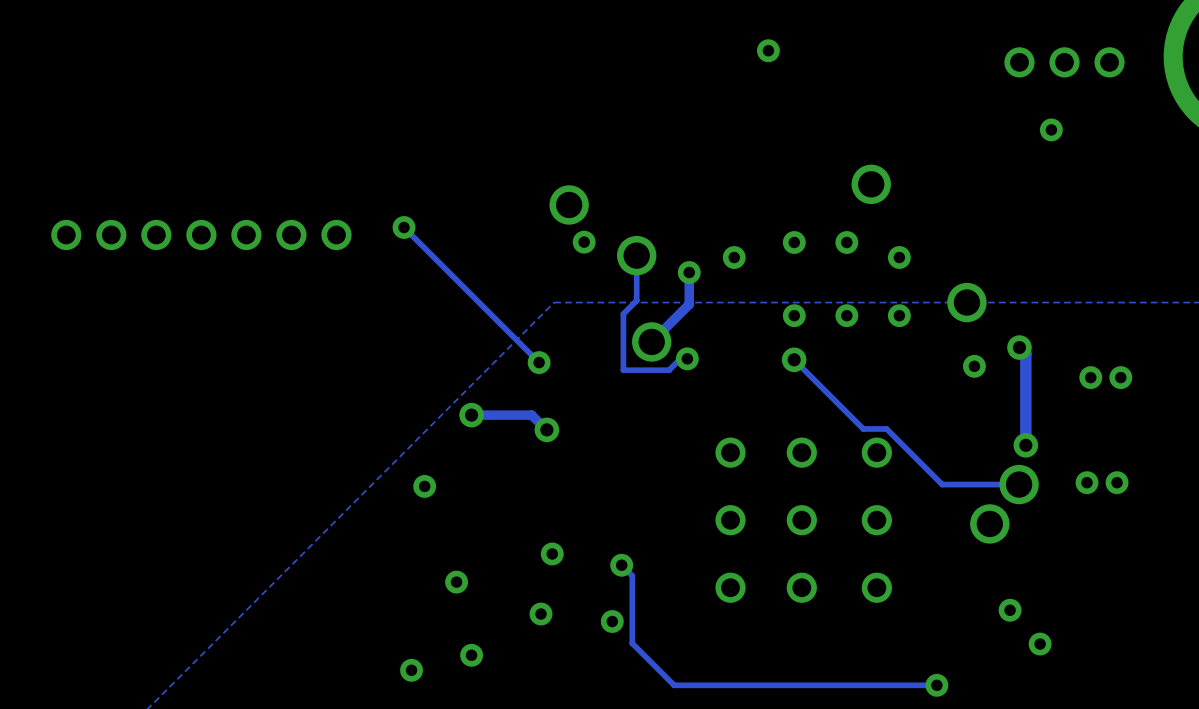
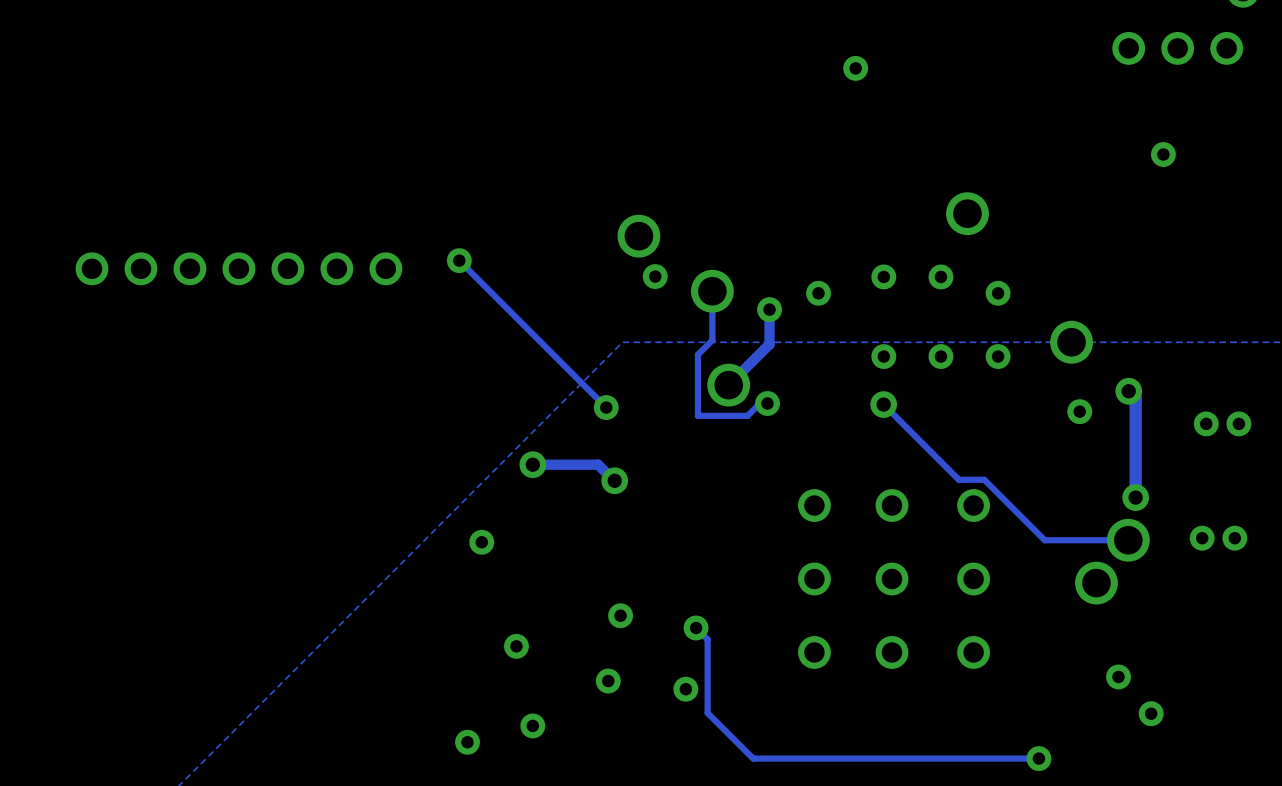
via position: (1019, 62) -> (1128, 48)
via position: (1064, 62) -> (1177, 48)
via position: (1109, 62) -> (1226, 48)

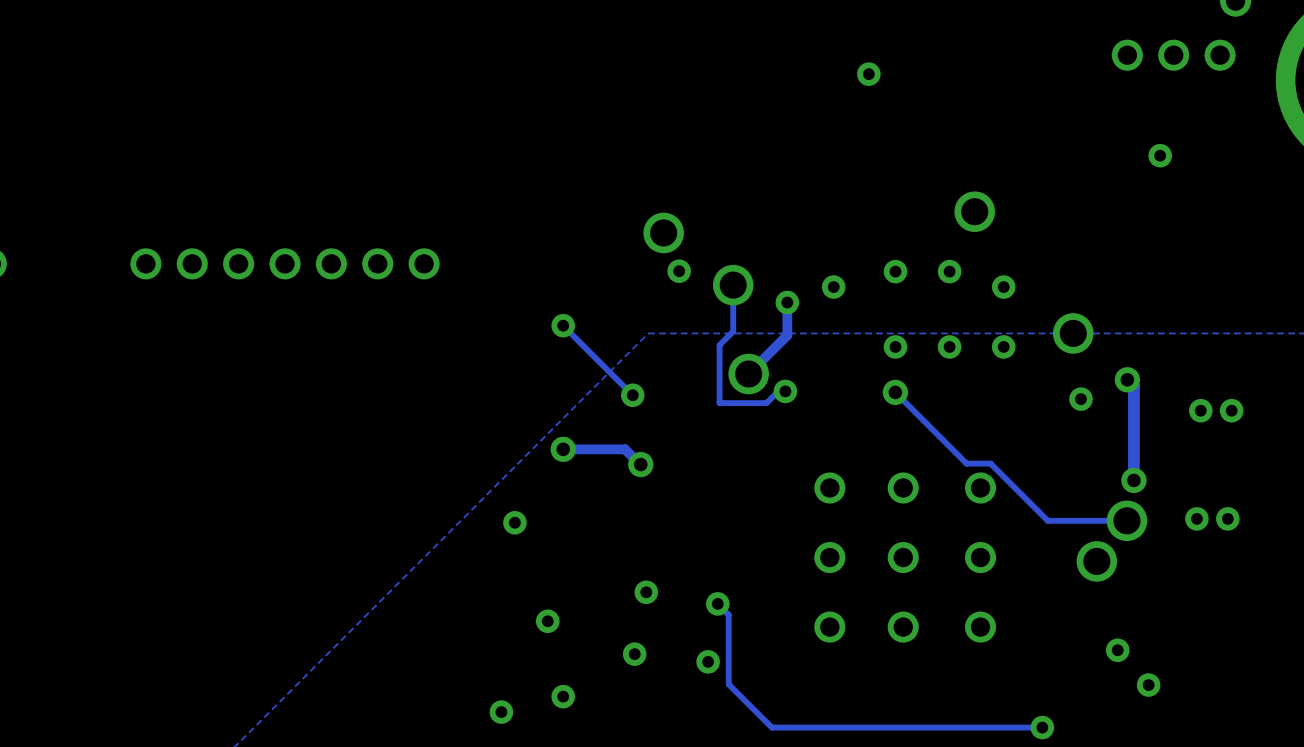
track: (459, 260) (532, 334) -> none
via position: (459, 260) -> (563, 325)

